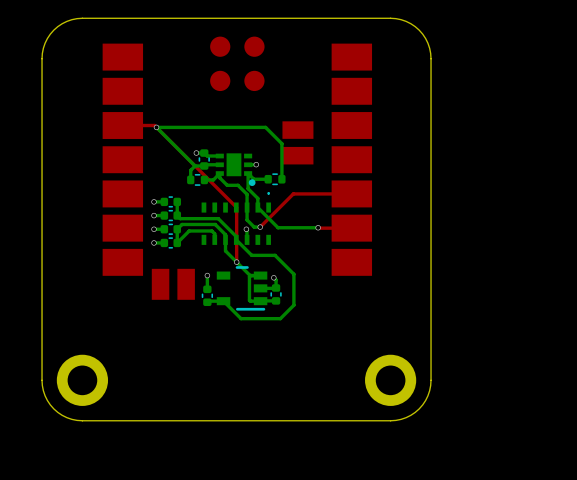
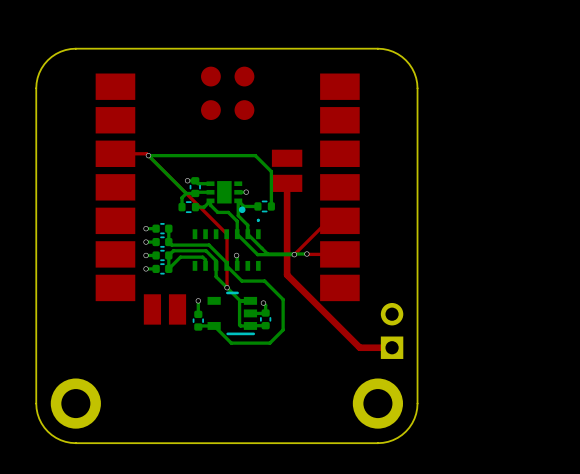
top track: none -> (287, 183) (287, 274) (359, 347) (392, 347)
top track: (339, 193) (293, 193) (260, 227) -> (328, 220) (294, 254)
bottom track: (247, 207) (247, 219) (254, 227) (260, 227) -> (237, 234) (257, 254) (294, 254)
via position: (260, 227) -> (294, 254)
part: none -> (392, 330)

